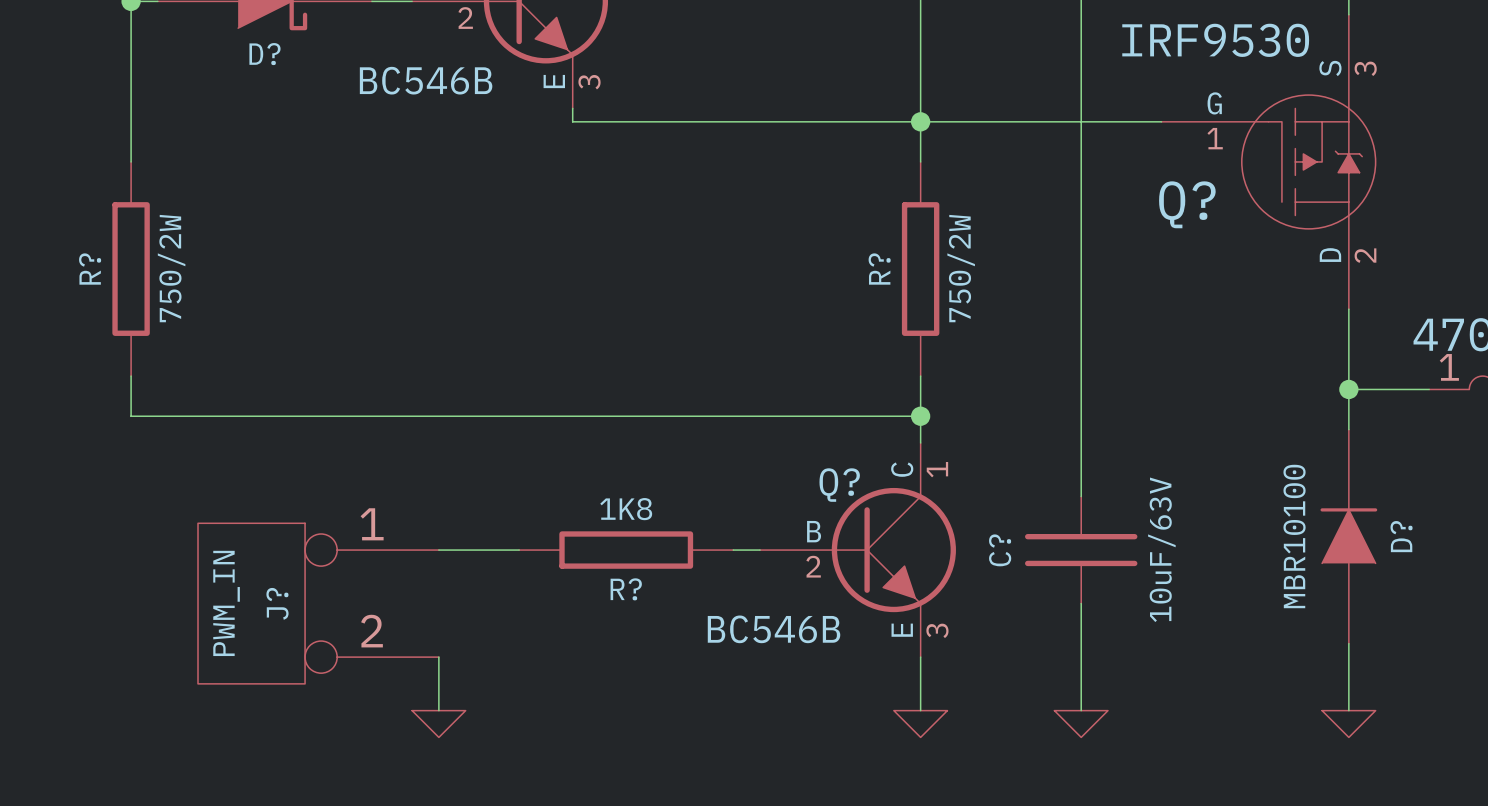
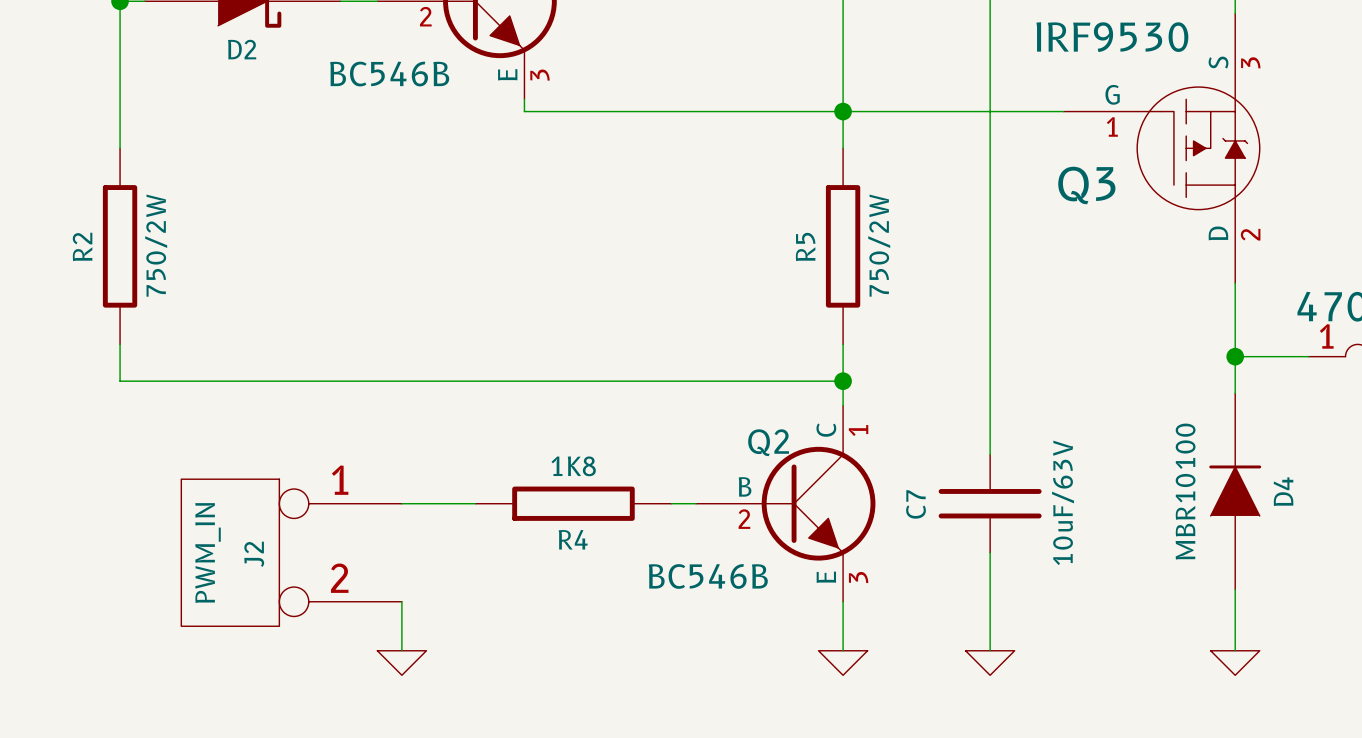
D? name: D? (264, 54) -> D2 (242, 49)
Q? name: Q? (1187, 204) -> Q3 (1086, 185)
R? name: R? (90, 269) -> R2 (82, 246)
R? name: R? (879, 269) -> R5 (805, 246)
Q? name: Q? (839, 485) -> Q2 (768, 442)
D? name: D? (1401, 536) -> D4 (1283, 491)
C? name: C? (1000, 550) -> C7 (915, 504)
R? name: R? (626, 589) -> R4 (573, 539)
J? name: J? (277, 603) -> J2 (254, 554)

